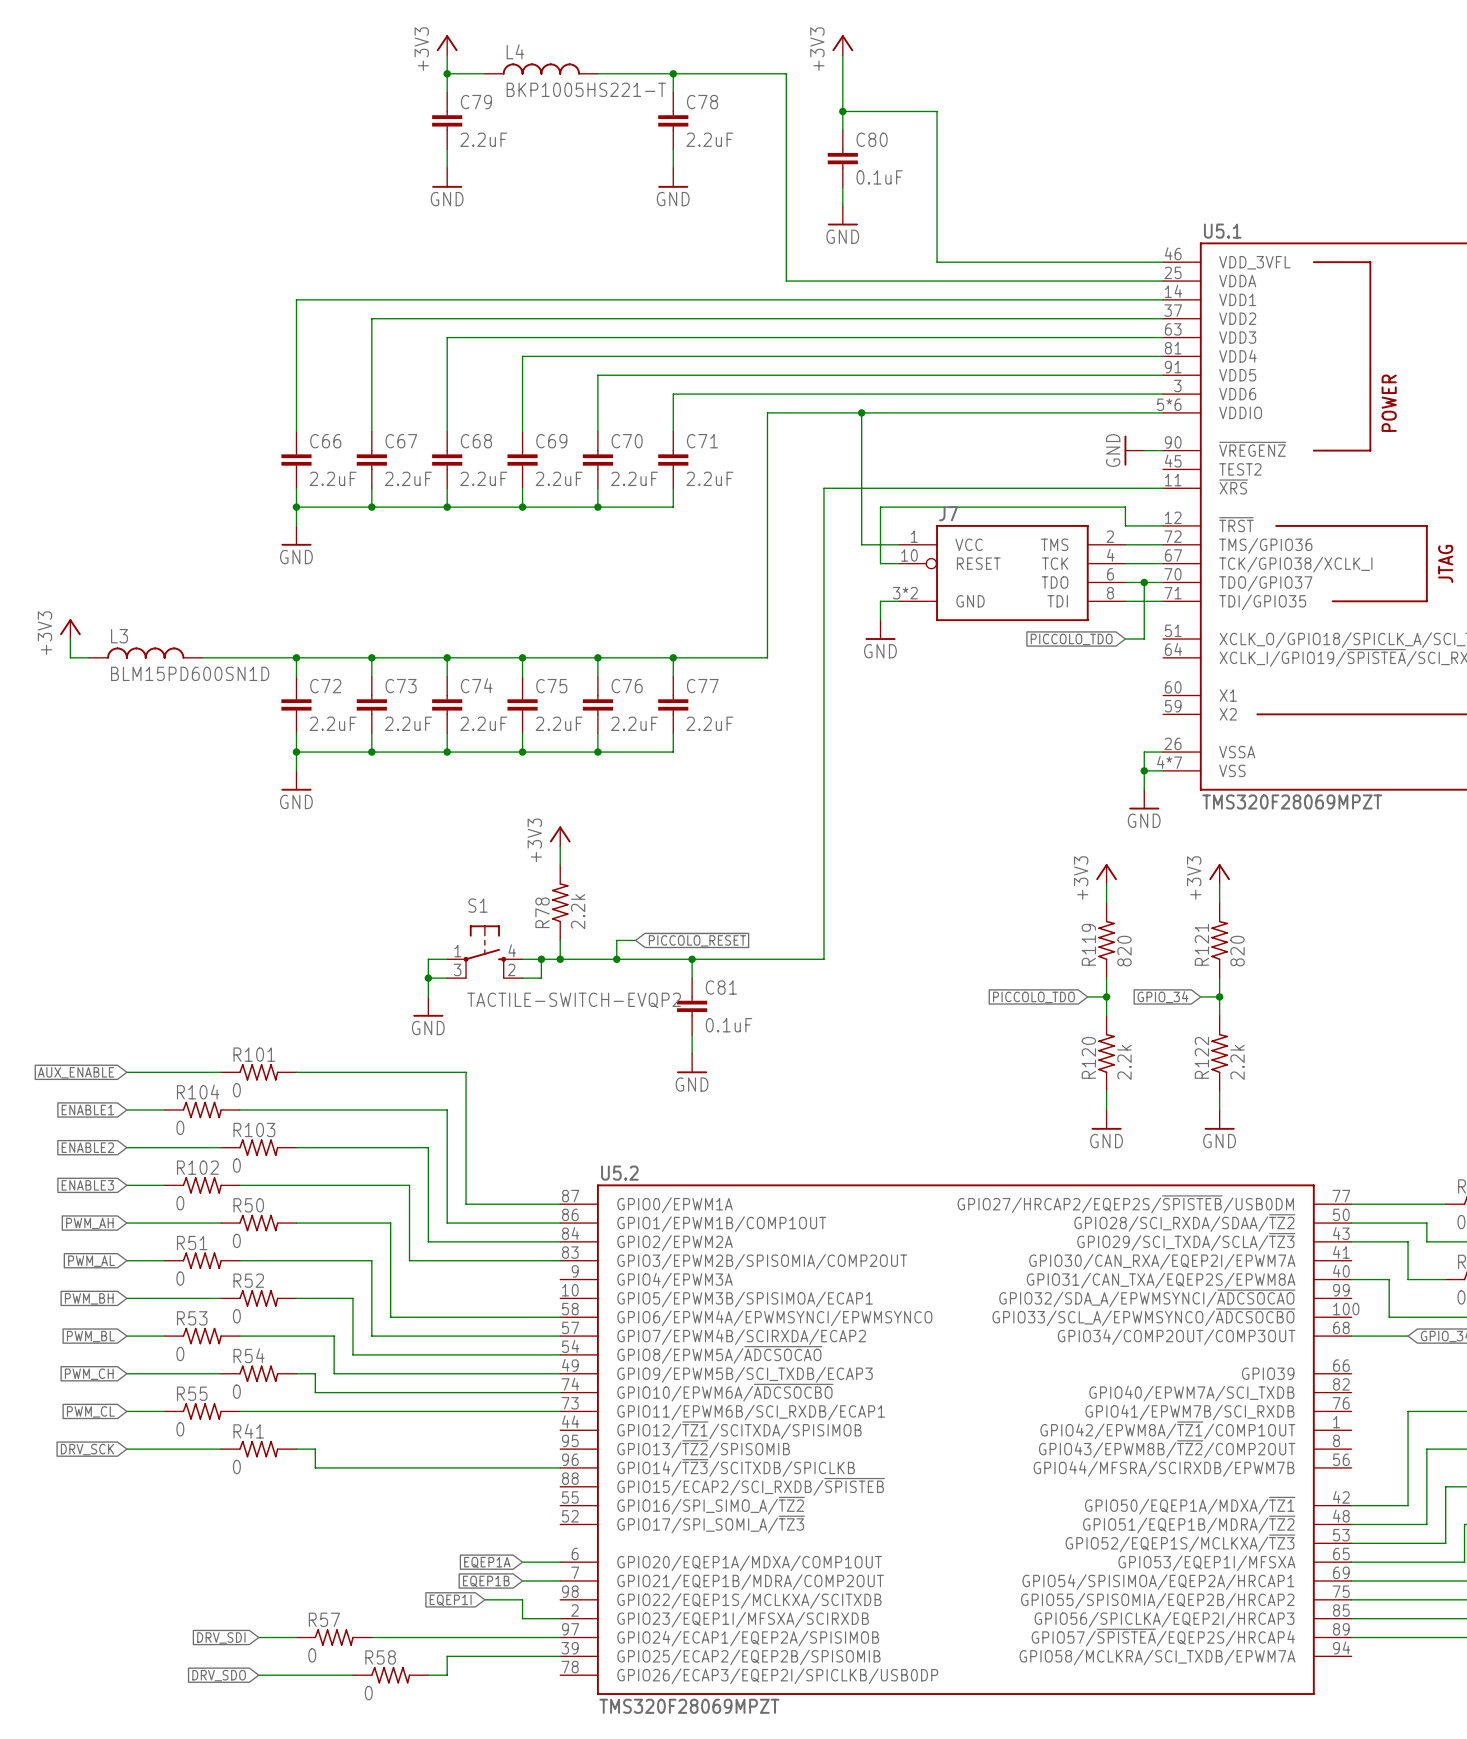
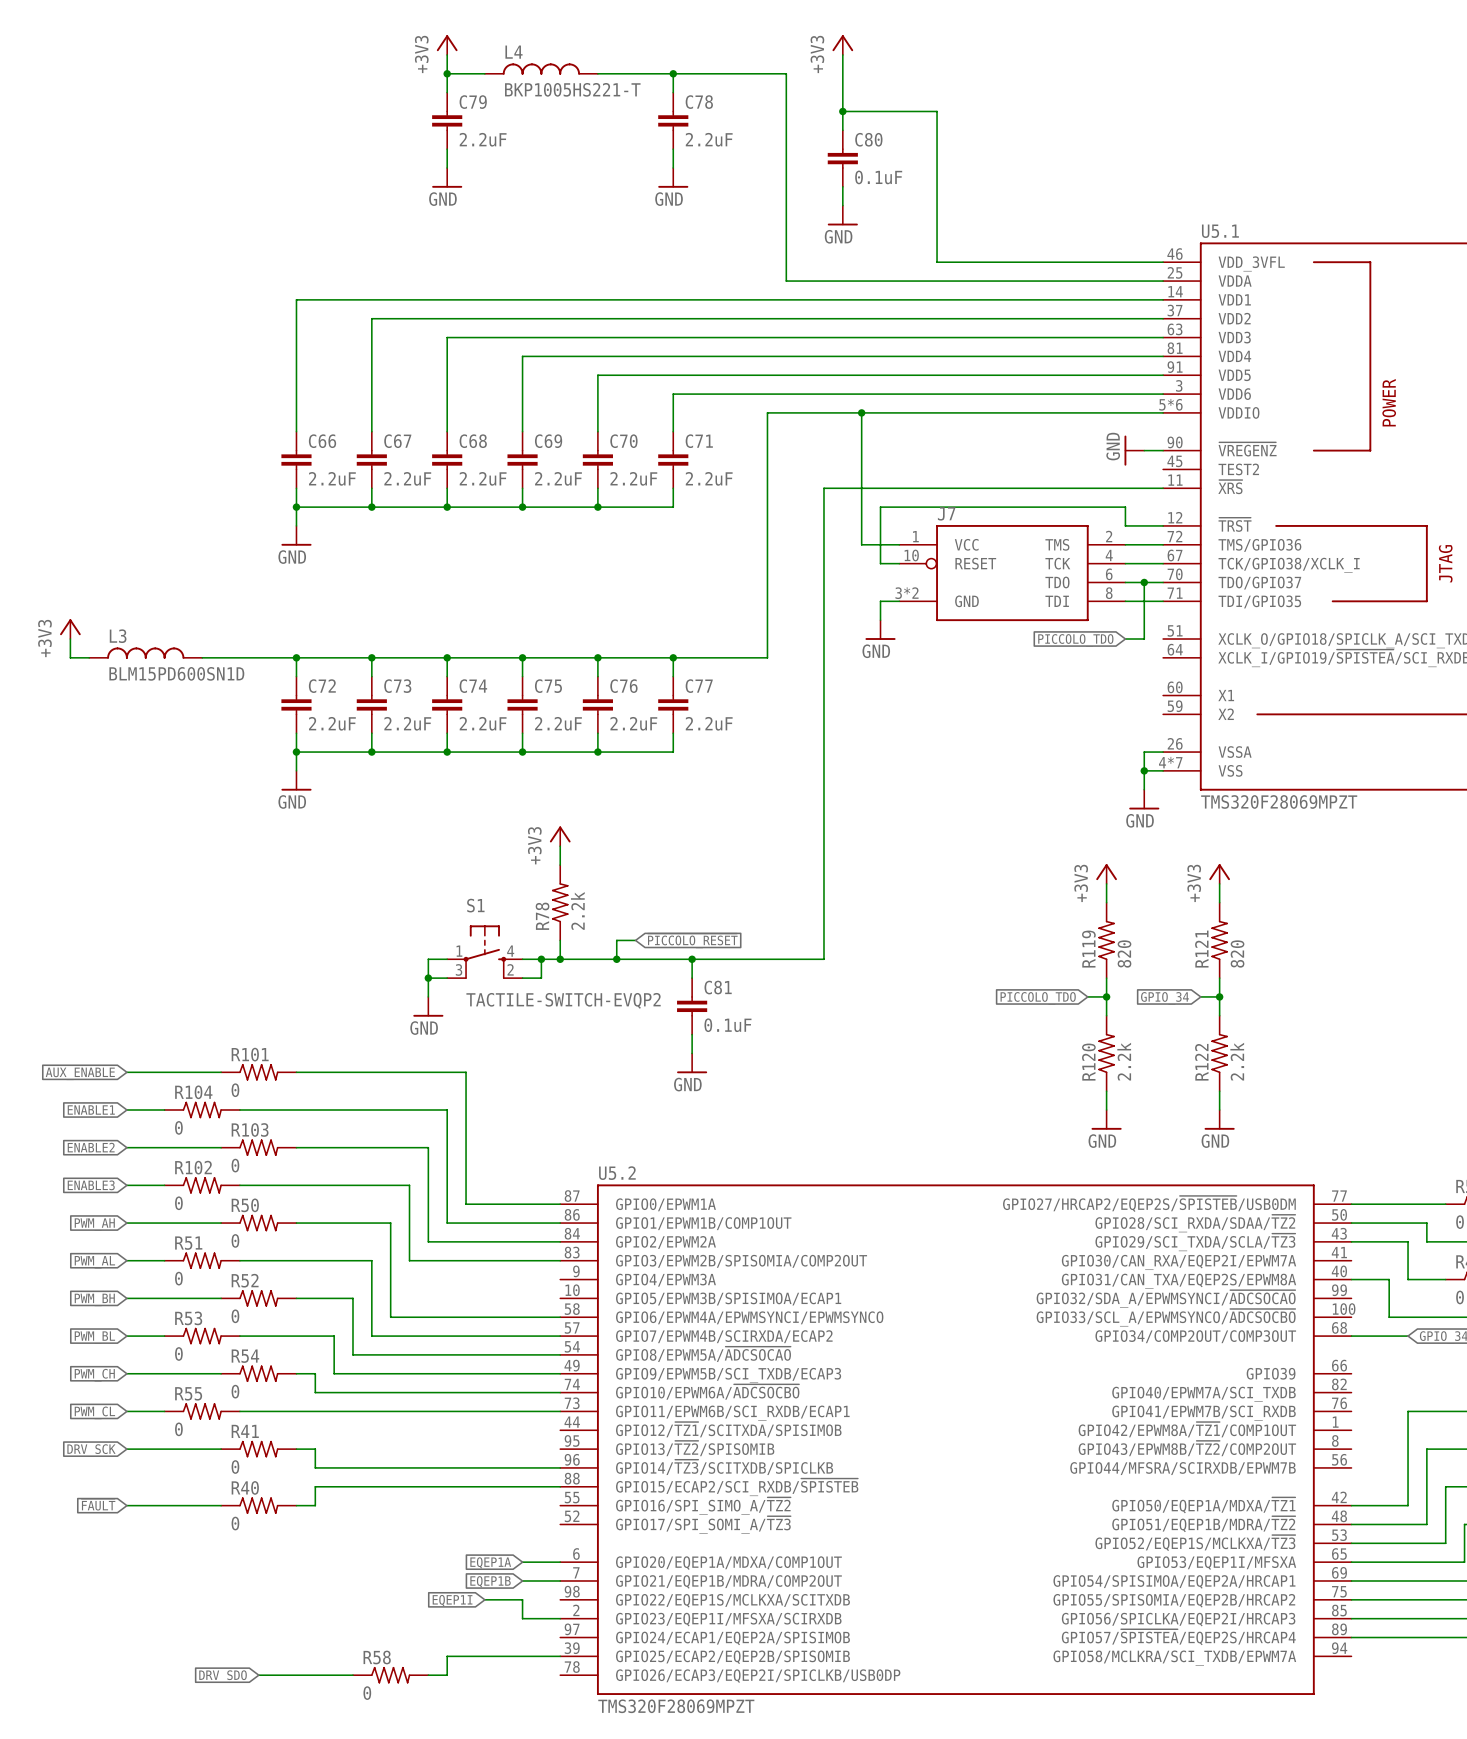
wire: none -> (560, 1486) (315, 1486) (315, 1505) (296, 1505)
global label: none -> ~{FAULT} (98, 1504)
wire: none -> (126, 1505) (221, 1505)
R40: none -> 0 (258, 1505)
global label: DRV_SDI (221, 1637) -> none
wire: (258, 1637) (296, 1637) -> none
R57: 0 (334, 1637) -> none
wire: (371, 1637) (560, 1637) -> none

